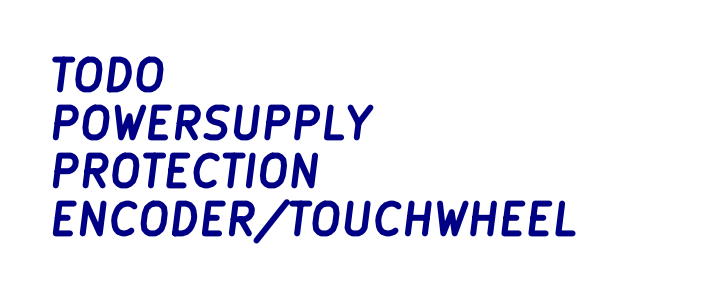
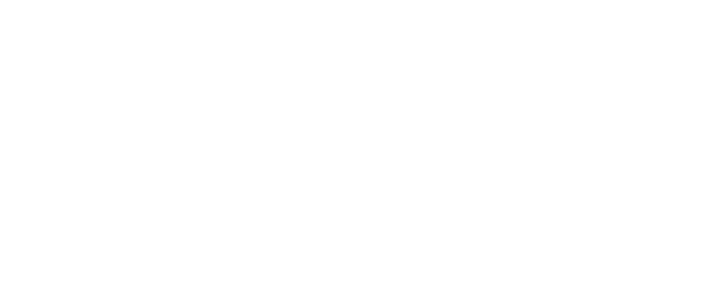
text: TODO (107, 74) -> none
text: POWERSUPPLY (213, 122) -> none
text: PROTECTION (185, 170) -> none
text: ENCODER/TOUCHWHEEL (314, 221) -> none

